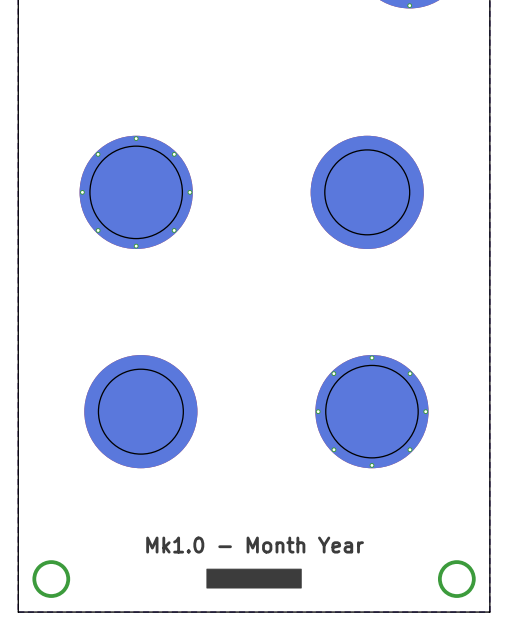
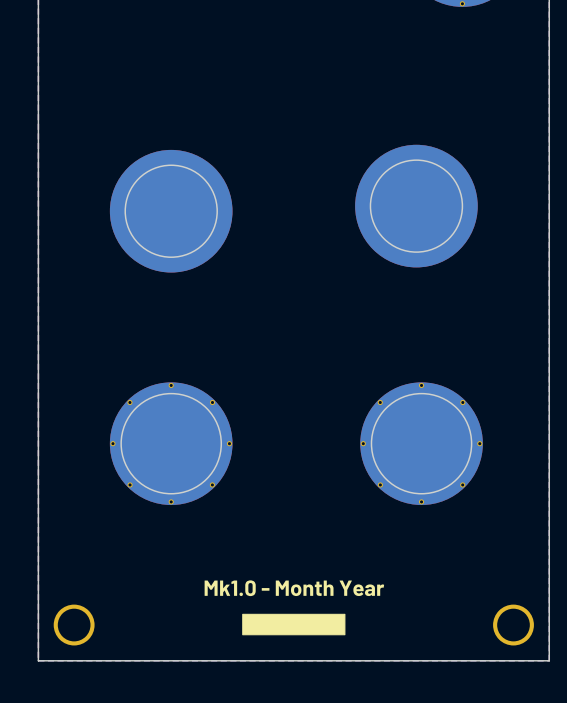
part footprint: [79, 135, 193, 249] -> [109, 149, 233, 273]
part footprint: [84, 355, 198, 469] -> [109, 382, 233, 505]

